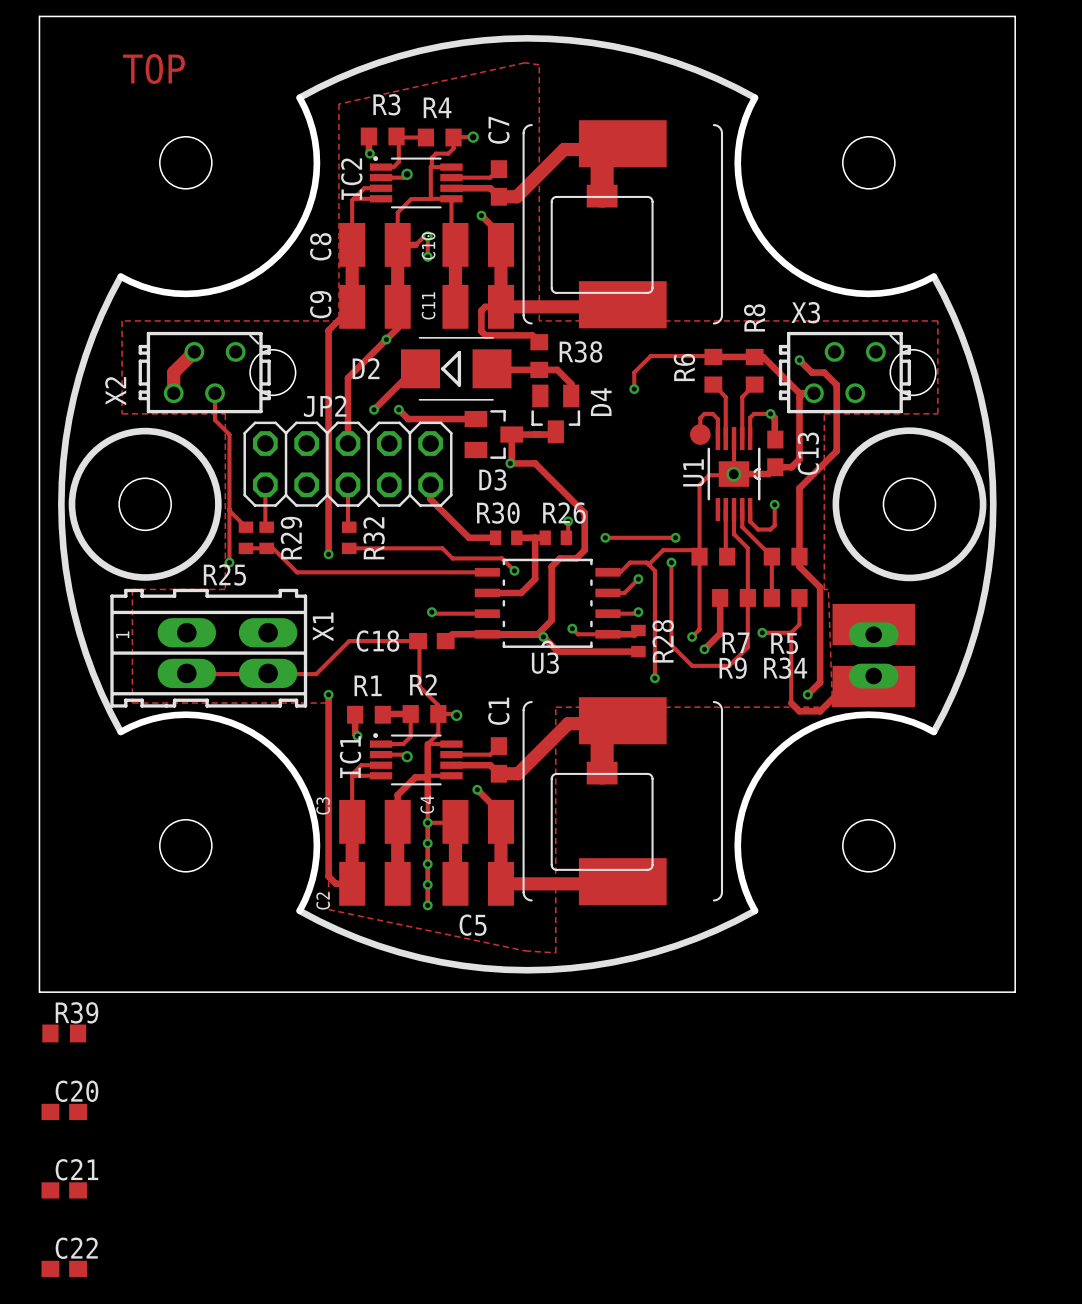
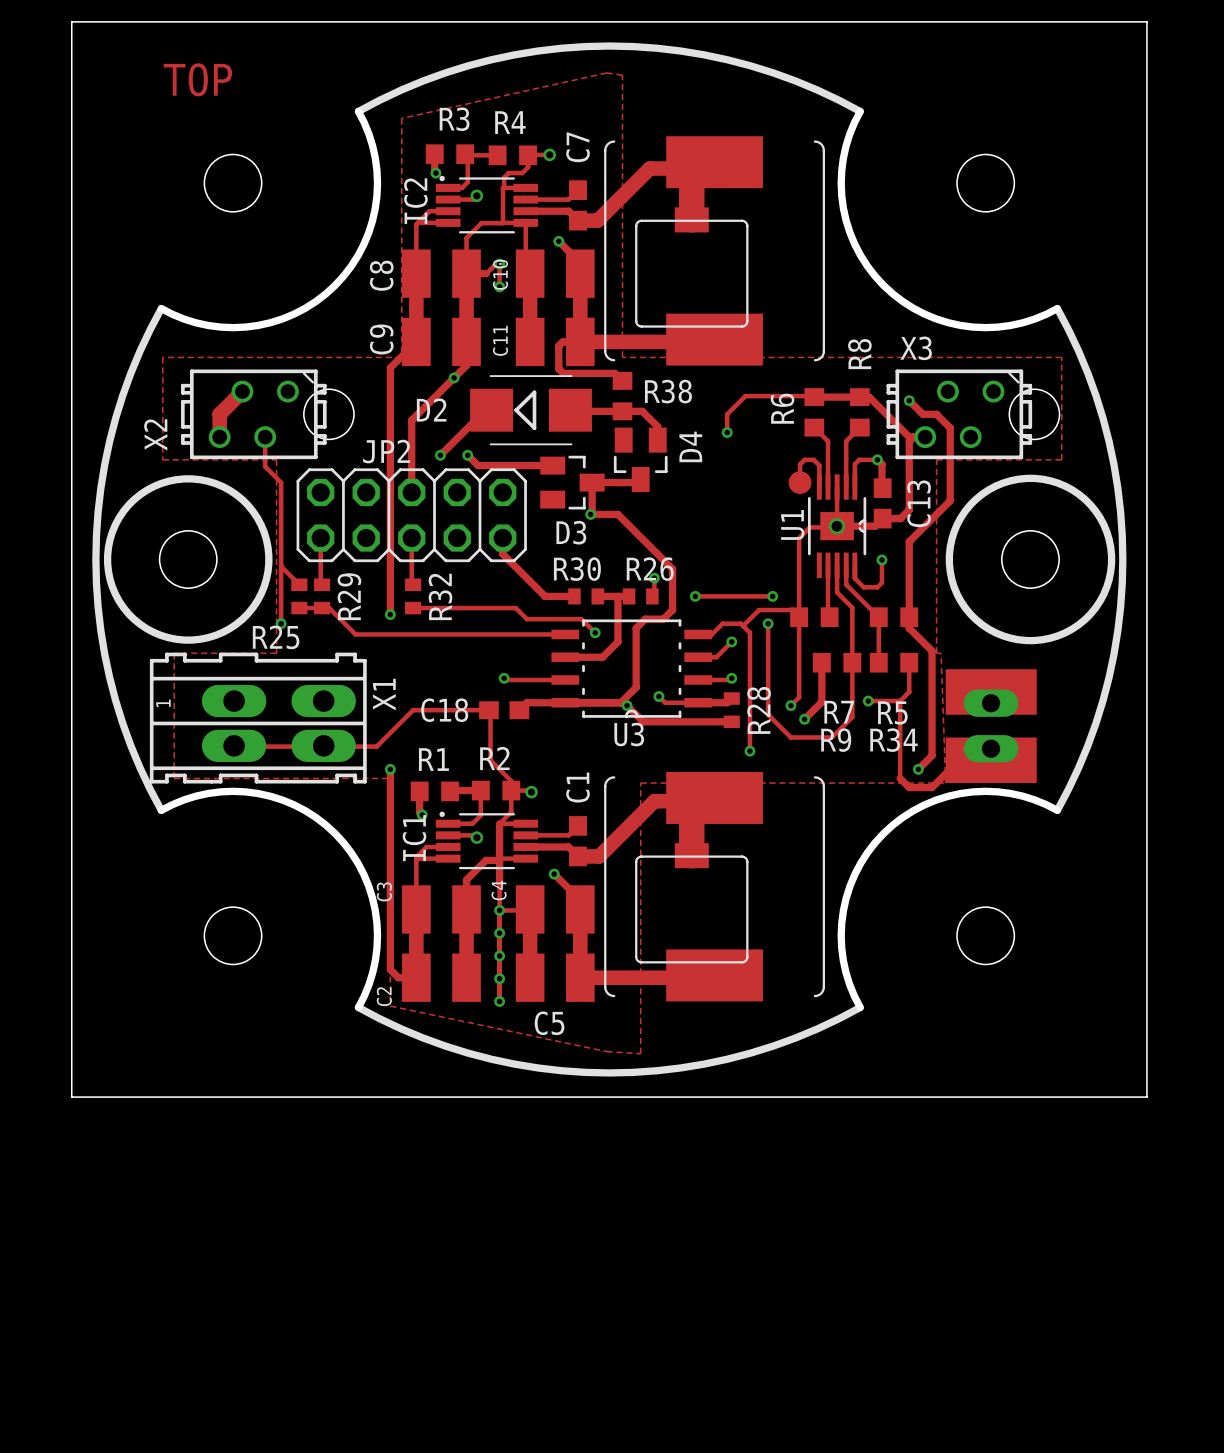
R39: (64, 1033) -> none
C20: (64, 1111) -> none
C21: (64, 1190) -> none
C22: (64, 1268) -> none

